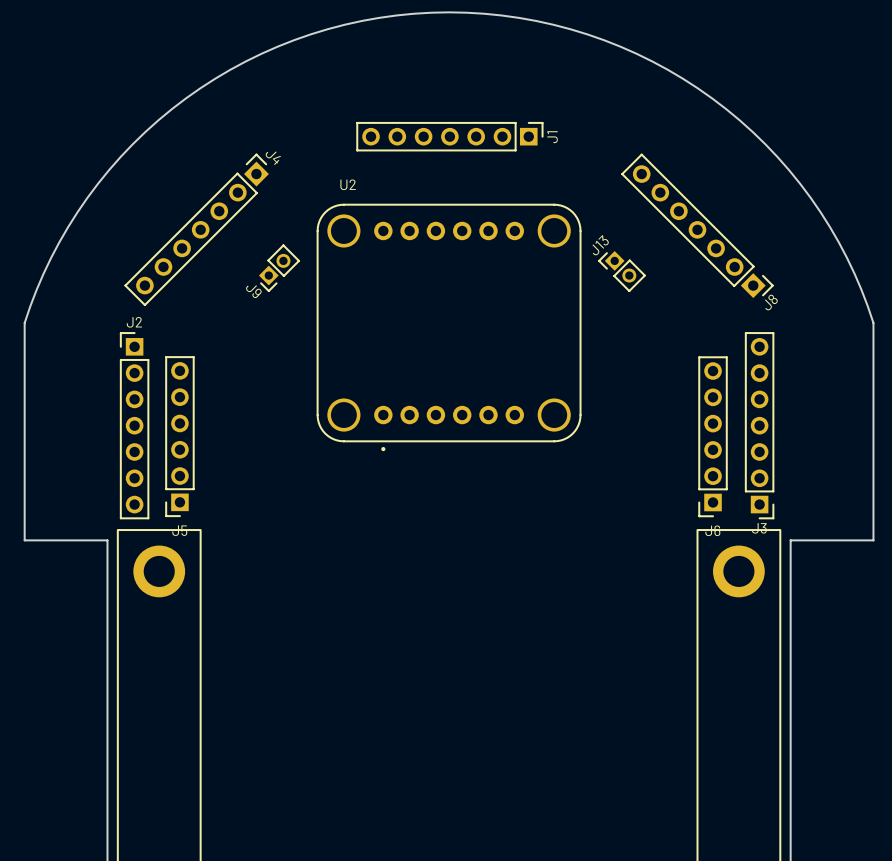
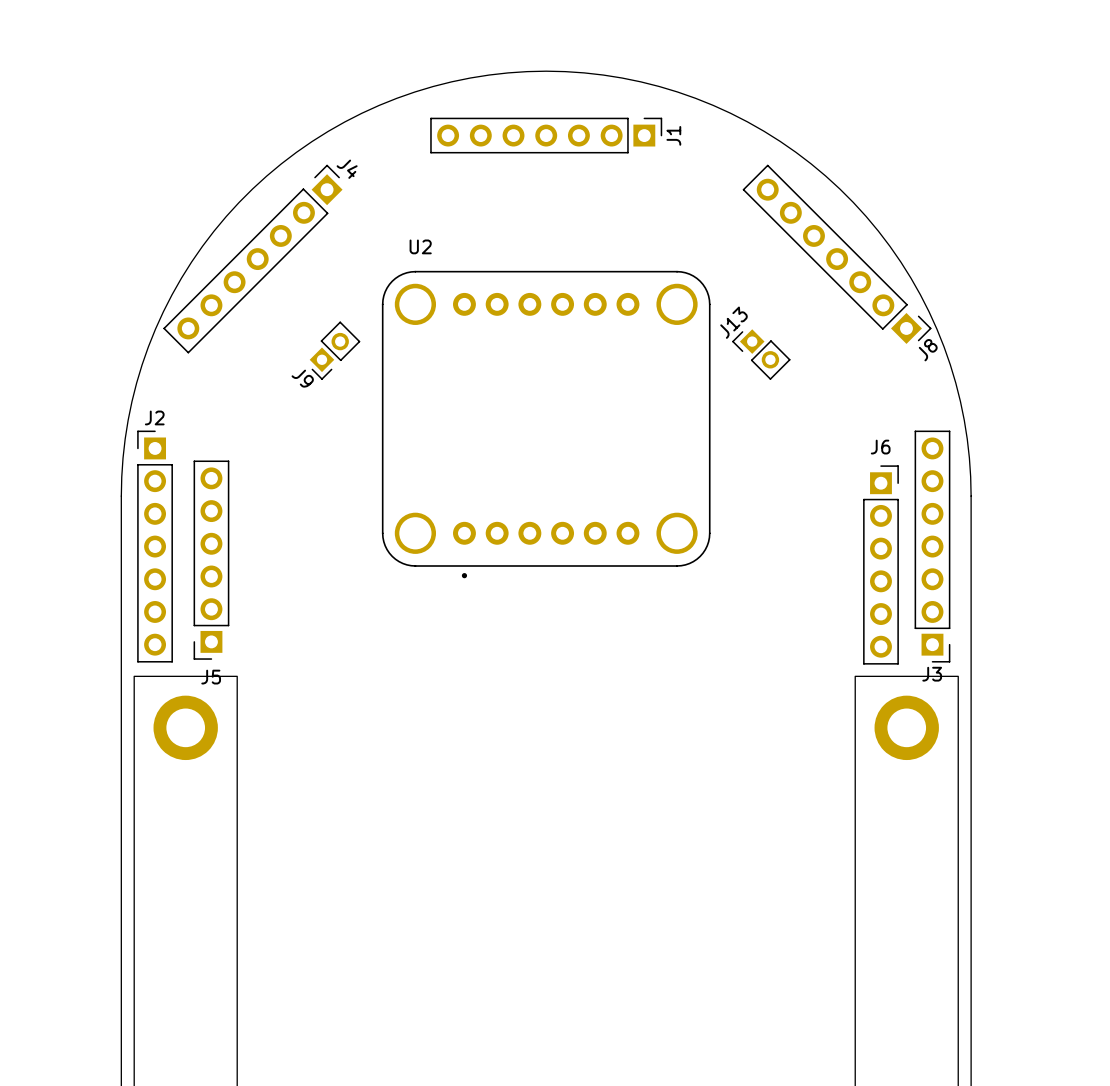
J1 position: (449, 136) -> (546, 135)
J8 position: (697, 226) -> (837, 254)
J4 position: (196, 229) -> (252, 259)
J6 rotation: 0° (713, 436) -> 180° (880, 564)
board edge: (107, 540) (24, 540) (24, 323) (51, 257) (77, 212) (109, 170) (145, 131) (186, 98) (230, 69) (277, 46) (327, 29) (379, 17) (449, 12) (501, 15) (553, 24) (604, 40) (652, 61) (697, 88) (739, 120) (789, 170) (820, 212) (854, 273) (873, 323) (873, 540) (790, 540) -> (121, 689) (121, 477) (128, 420) (136, 383) (155, 329) (172, 294) (191, 262) (226, 216) (252, 188) (296, 152) (344, 121) (396, 98) (451, 81) (489, 75) (546, 71) (603, 75) (659, 86) (695, 98) (747, 121) (795, 152) (839, 188) (878, 231) (900, 262) (920, 294) (936, 329) (950, 364) (964, 420) (970, 477) (971, 689)

